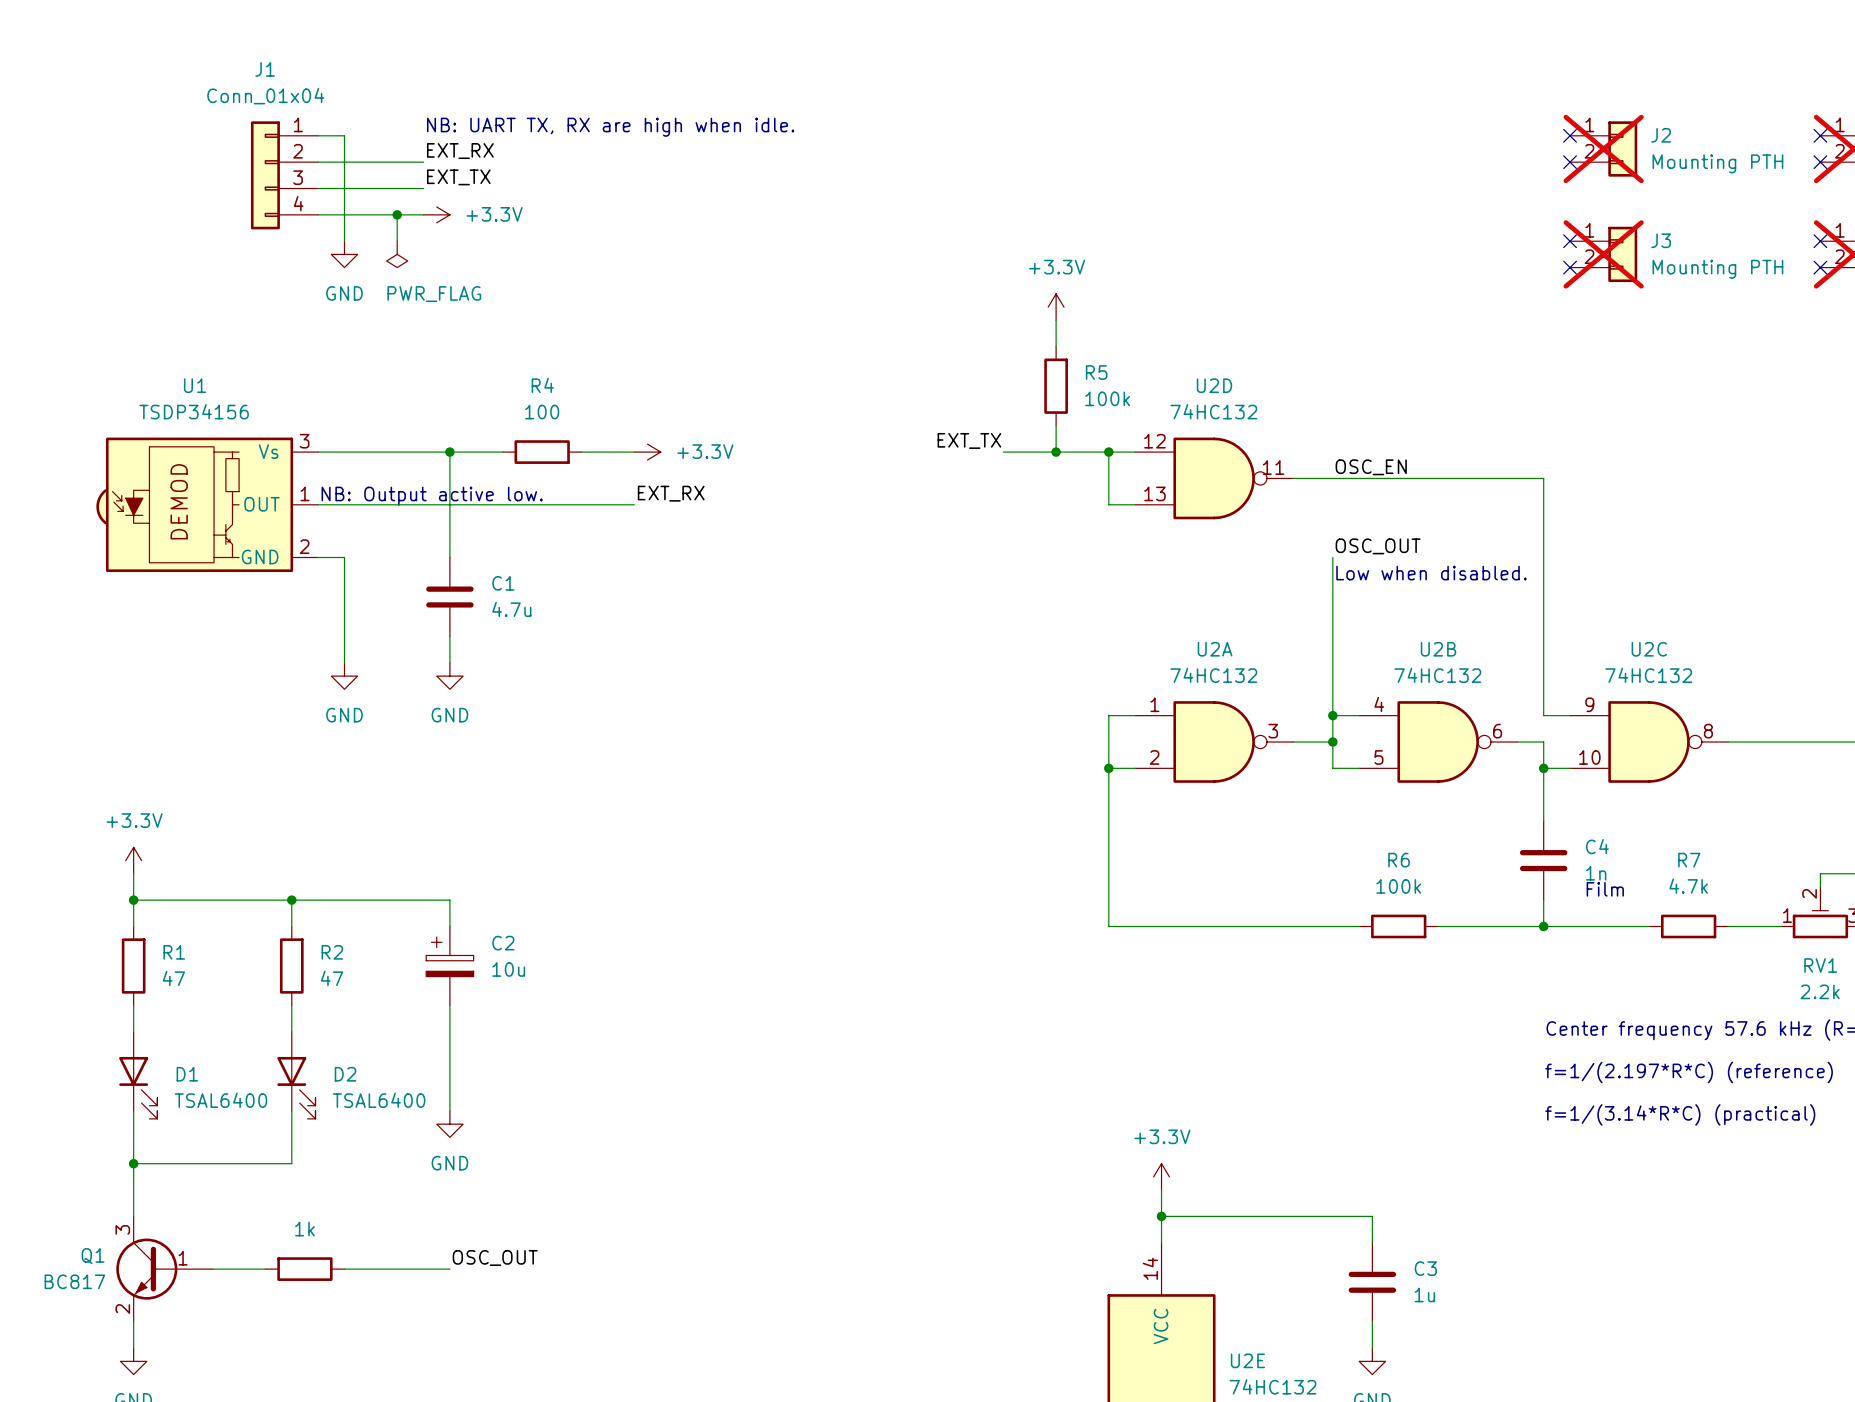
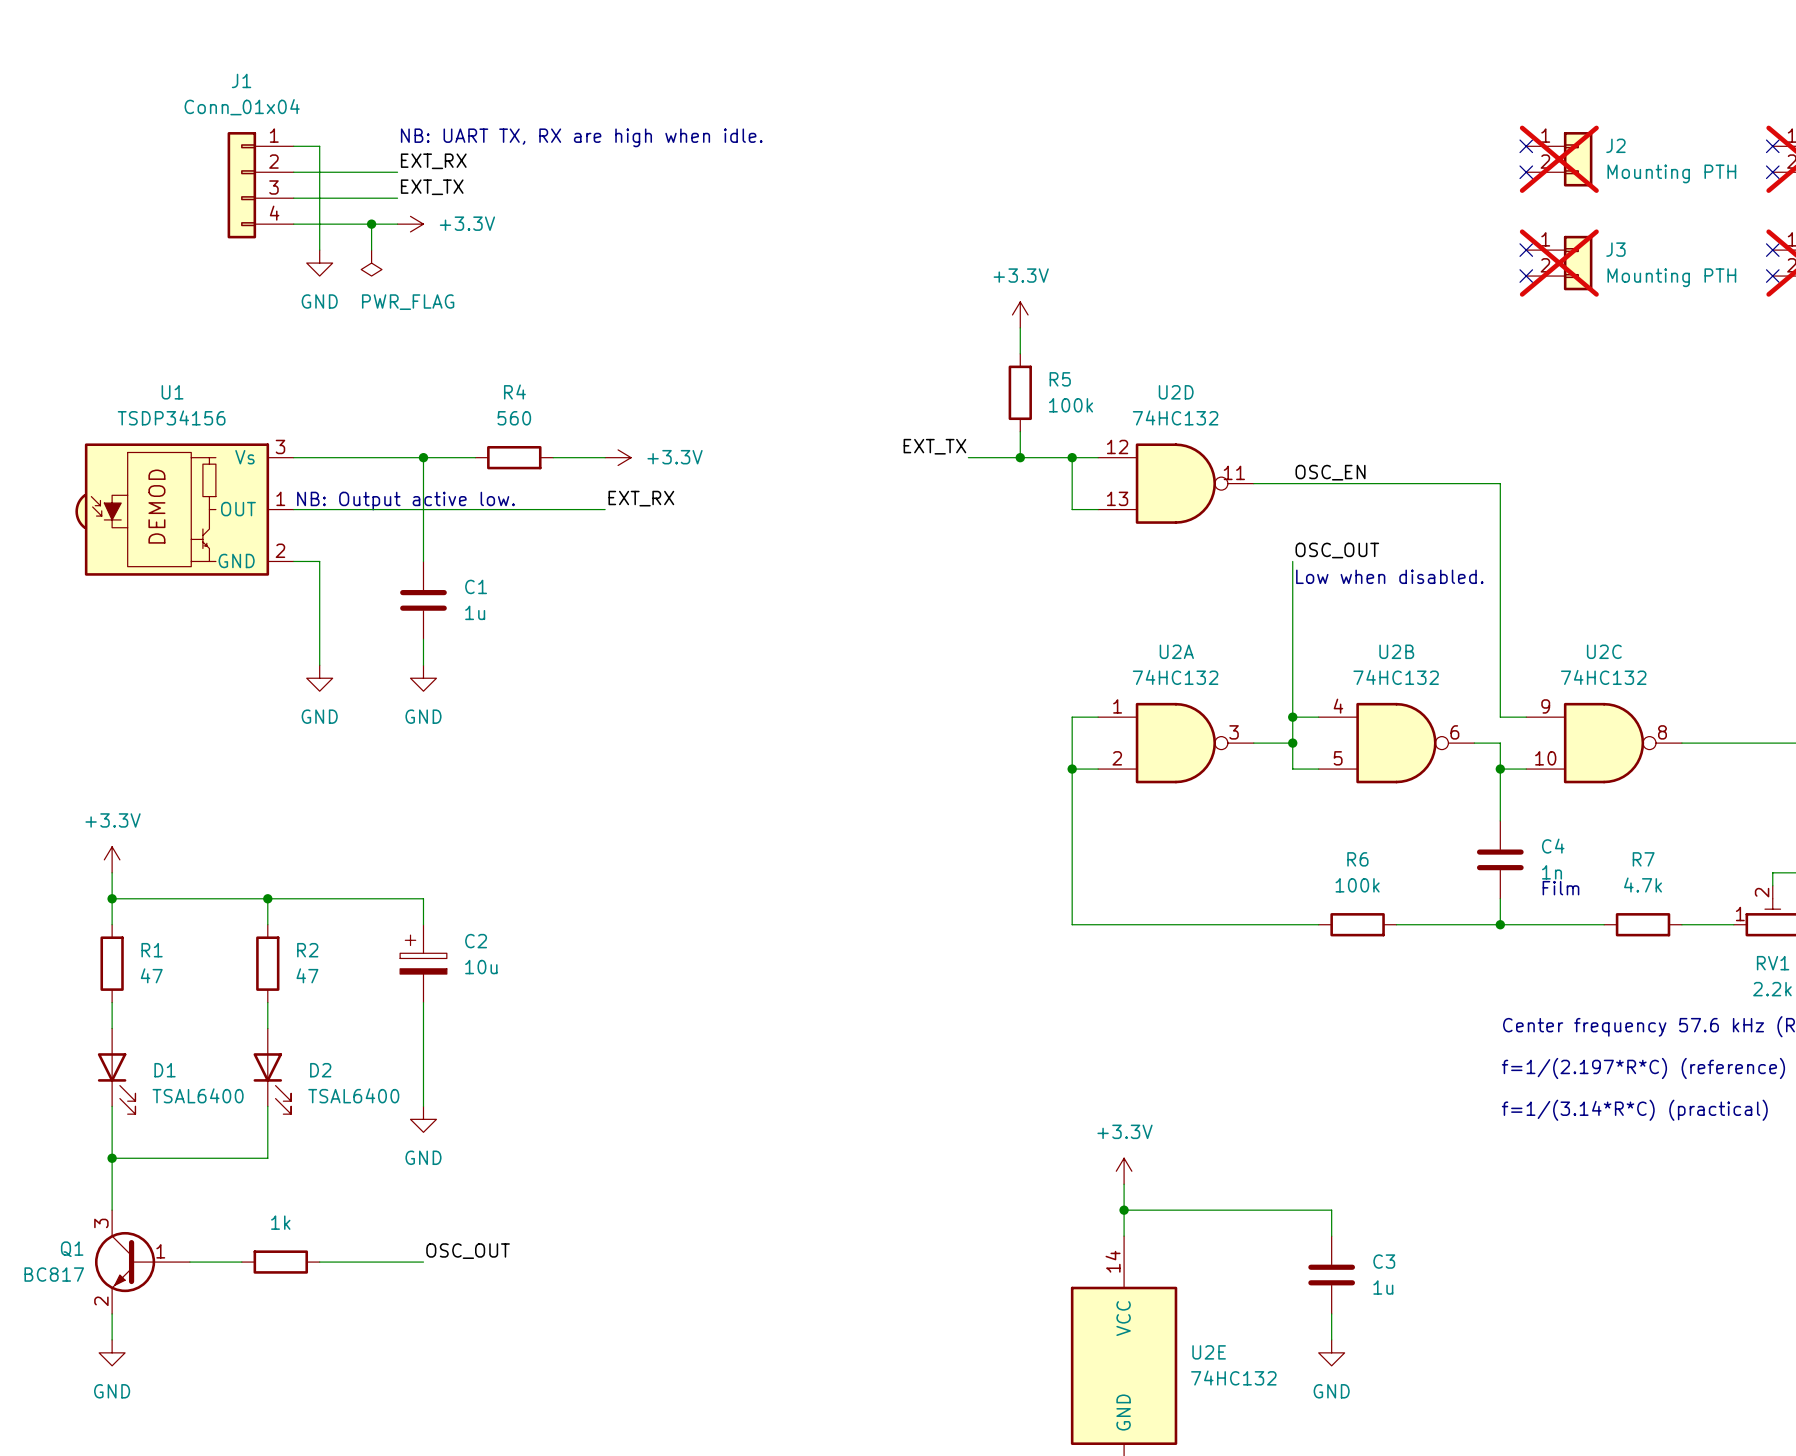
R4 value: 100 (542, 412) -> 560 (514, 418)
C1 value: 4.7u (511, 609) -> 1u (475, 612)

